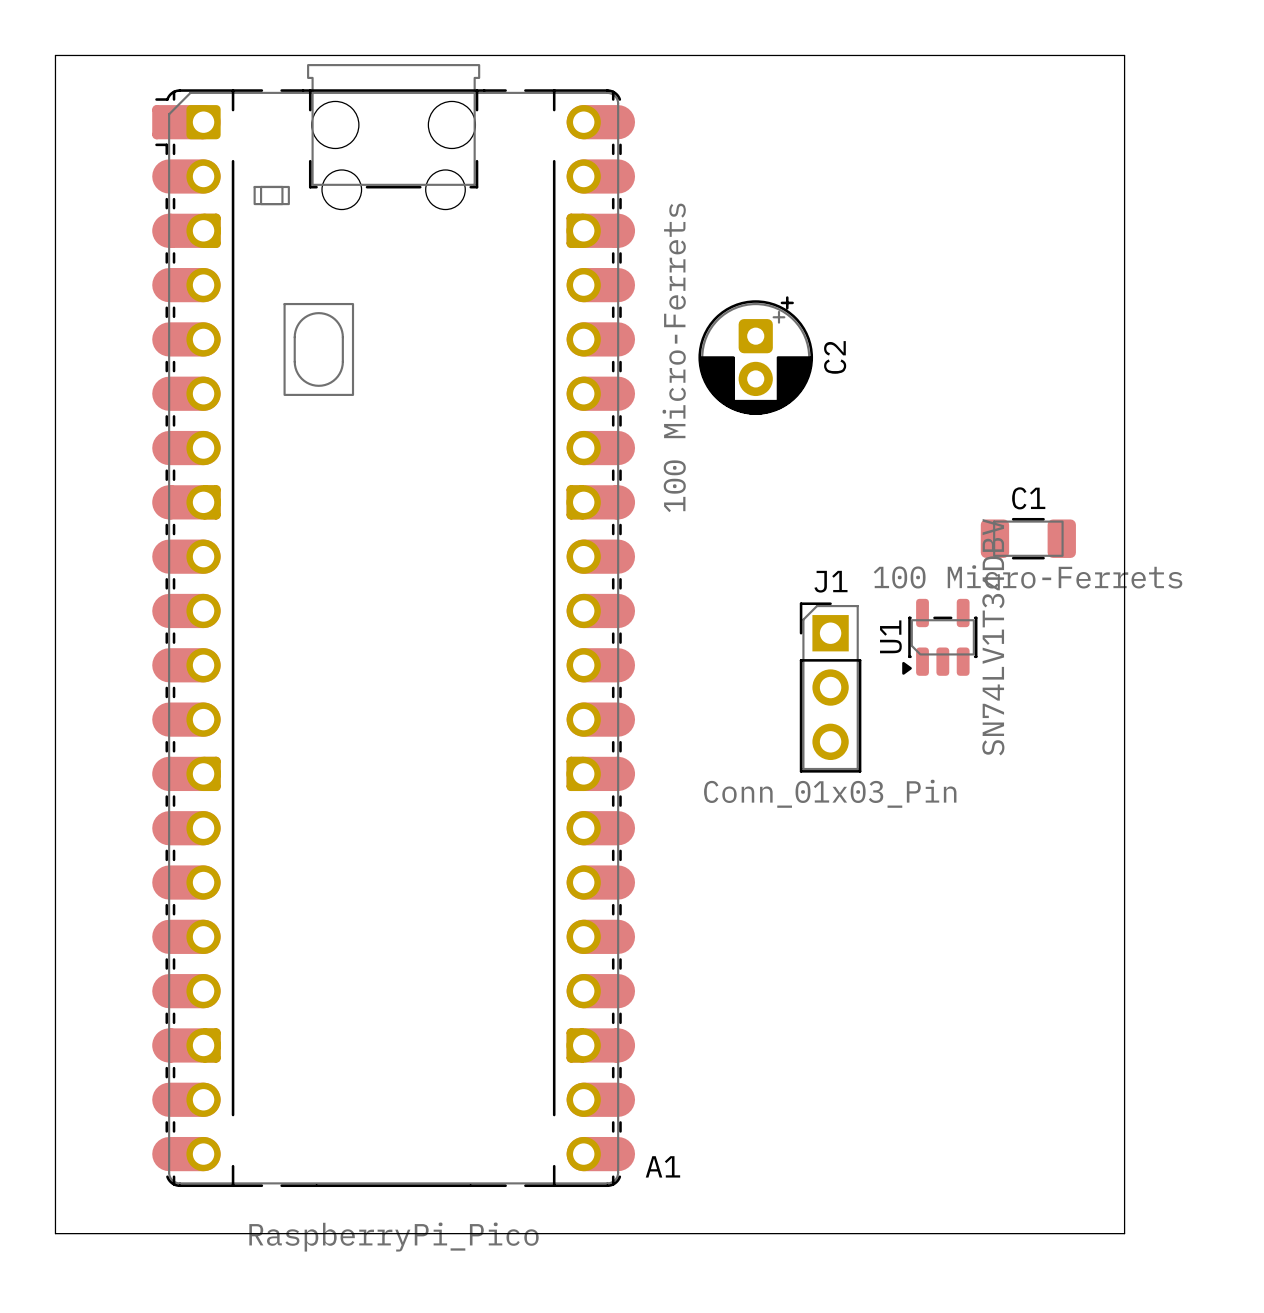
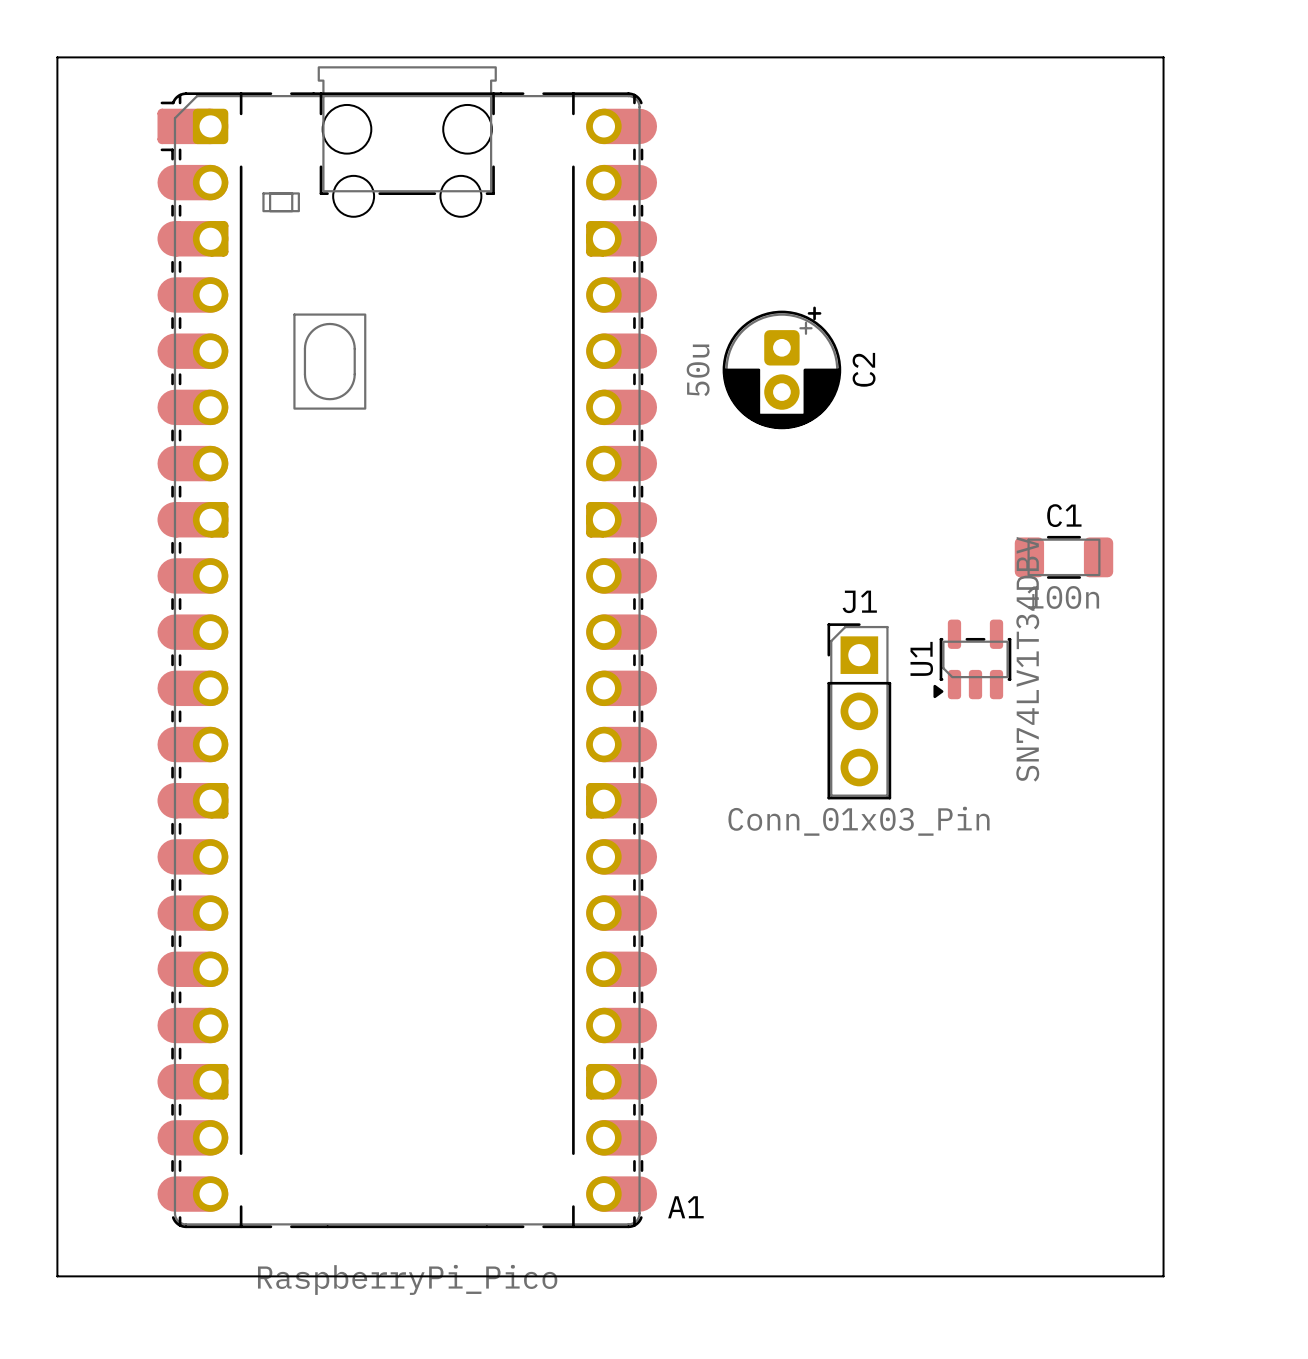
C2 value: 100 Micro-Ferrets (674, 357) -> 50u (698, 370)
C1 value: 100 Micro-Ferrets (1028, 576) -> 100n (1063, 597)

